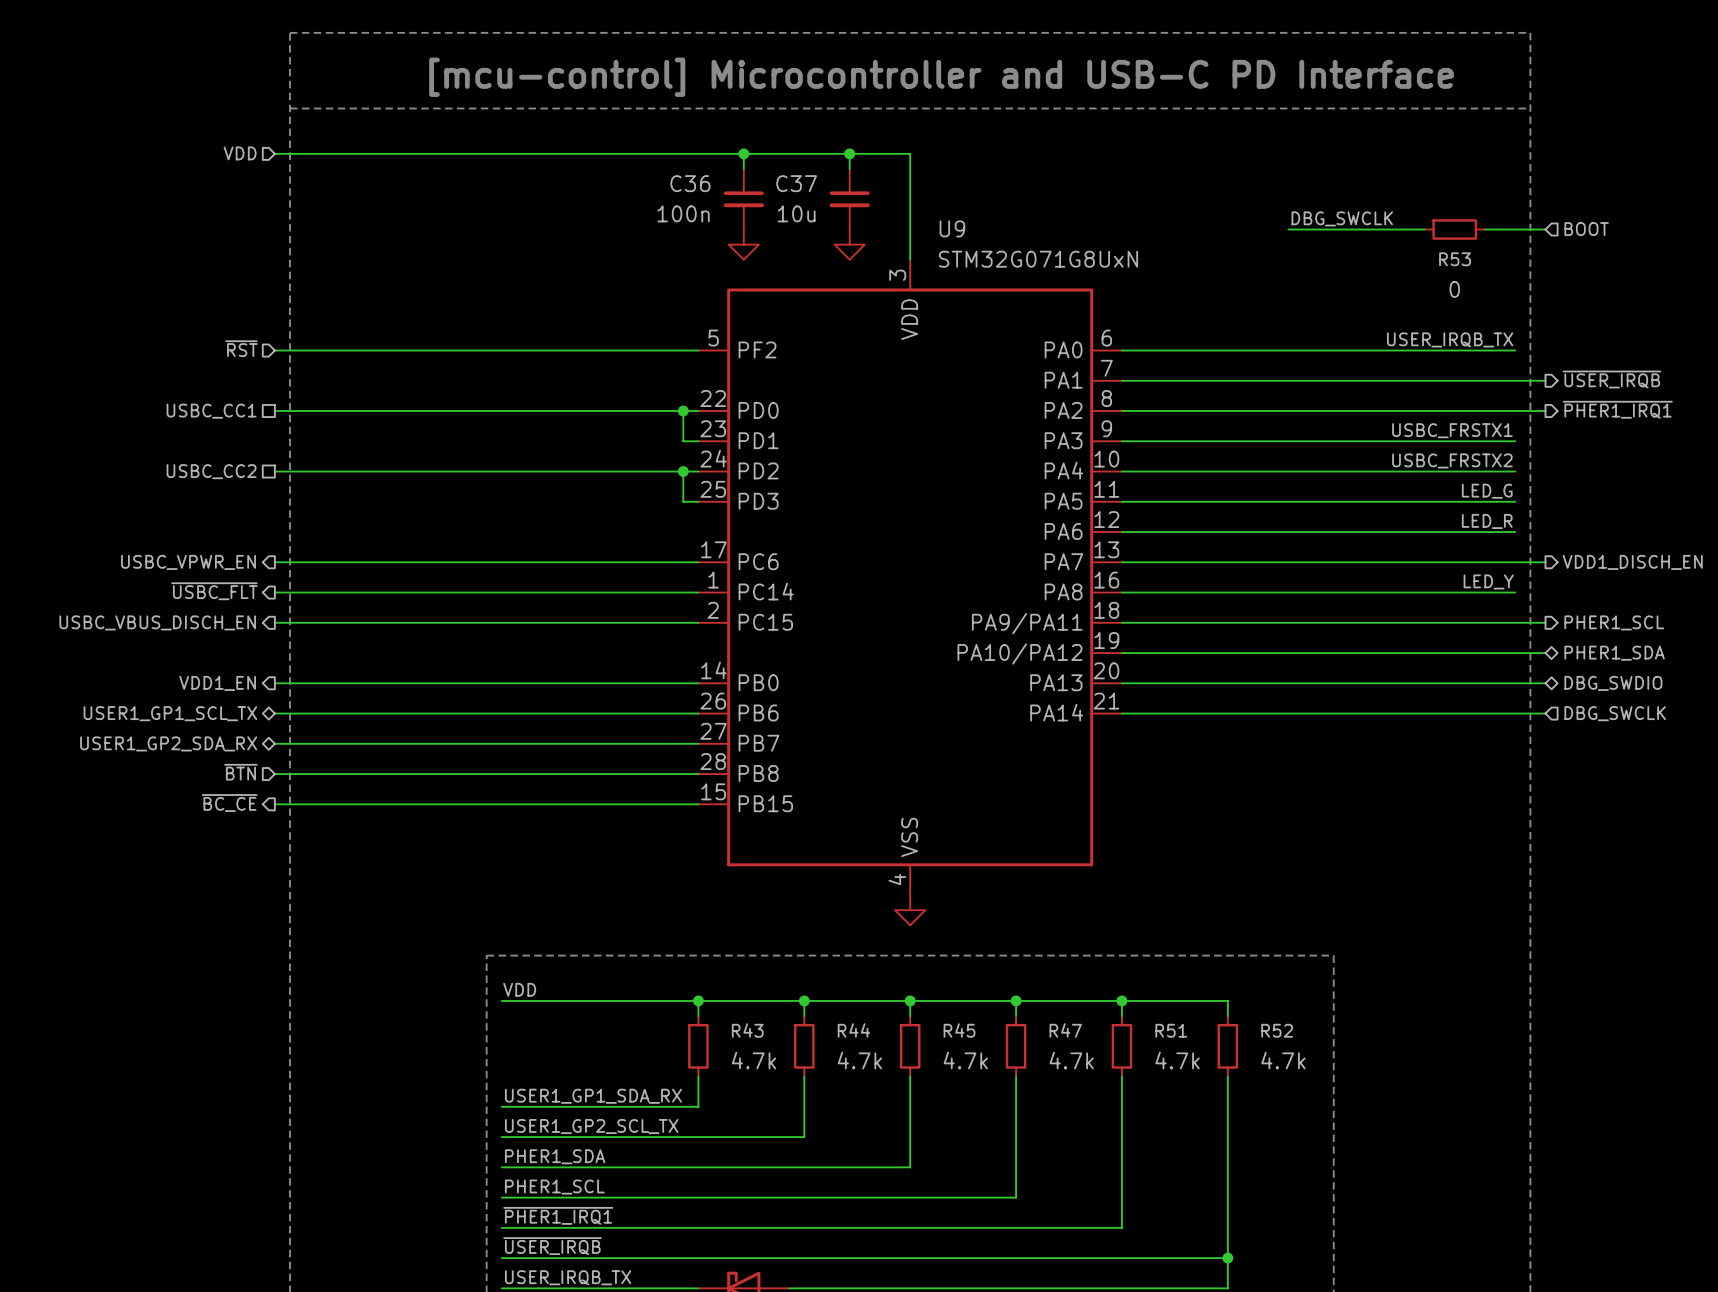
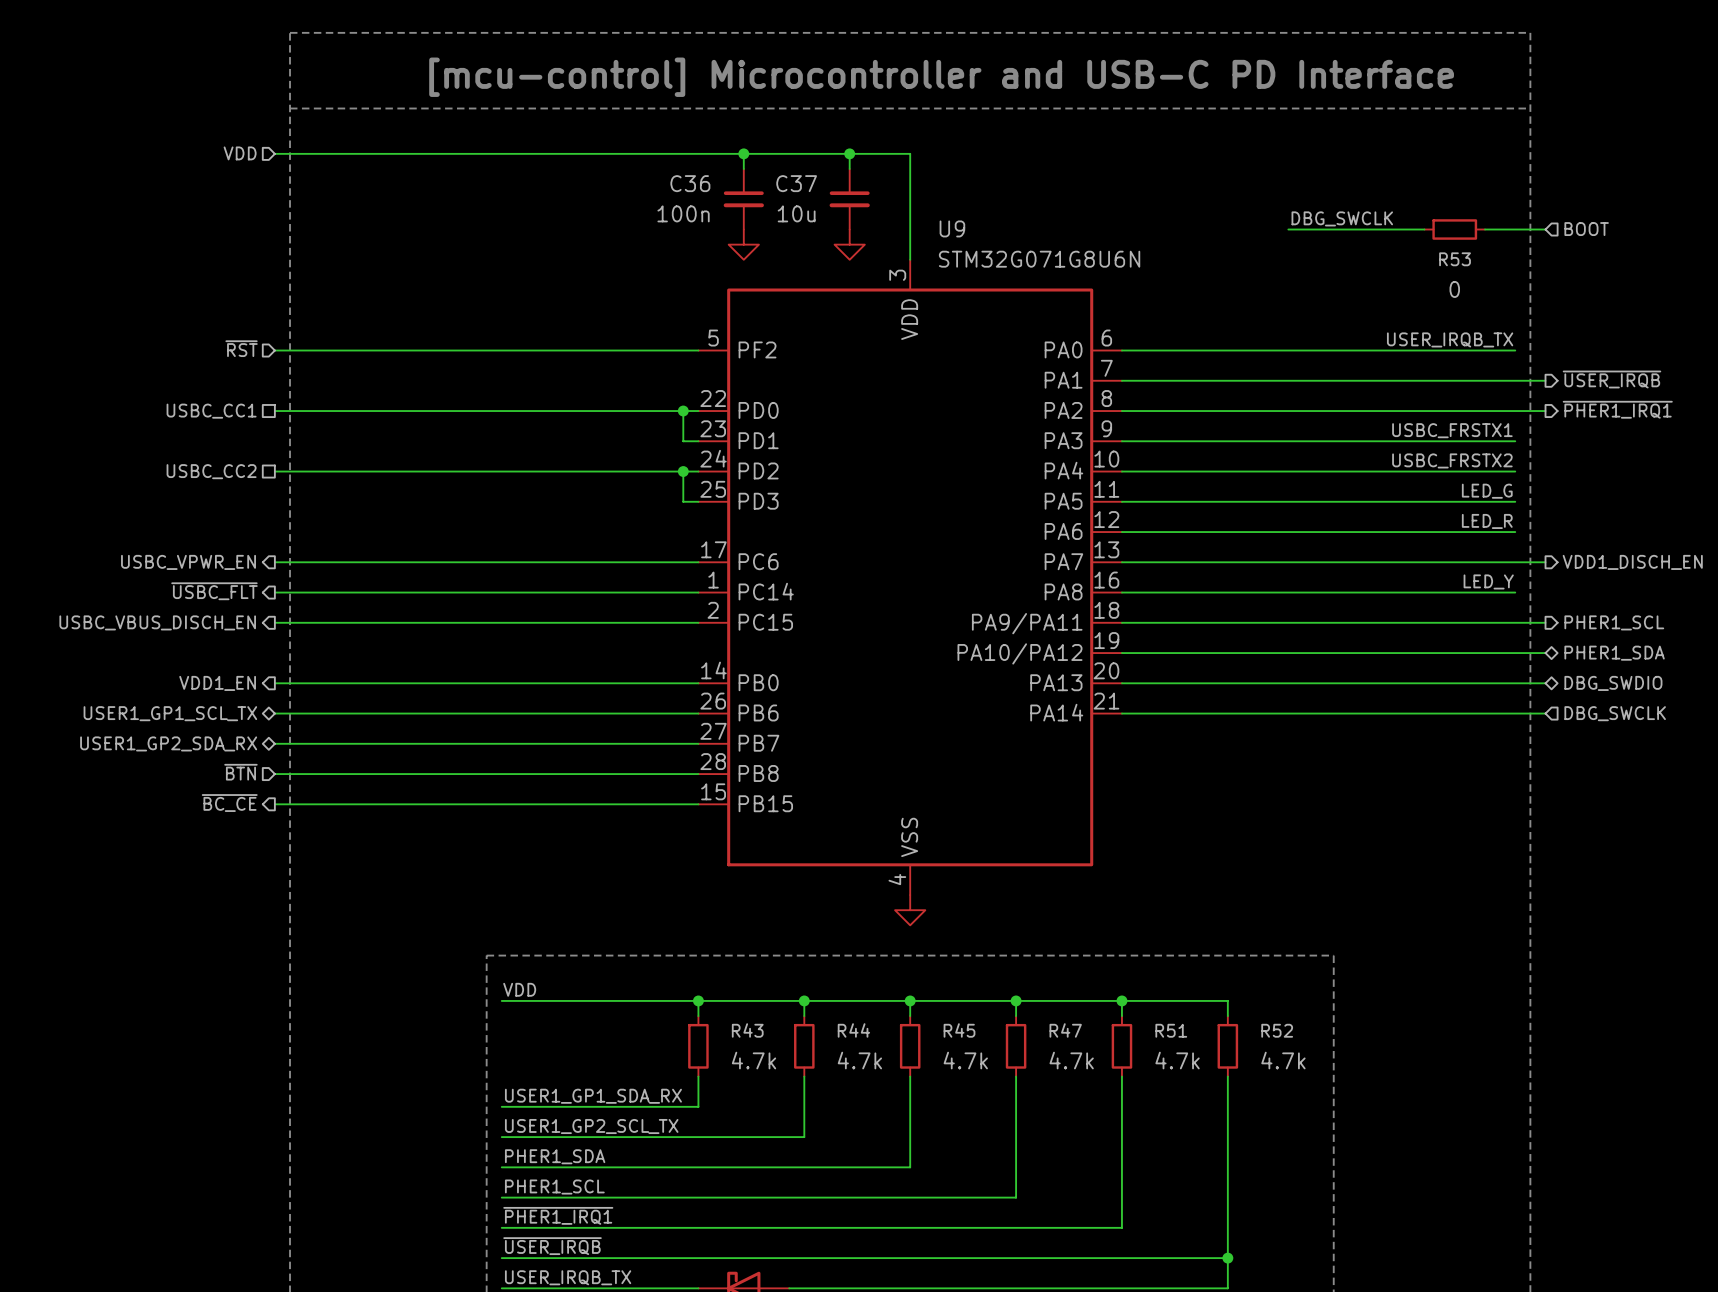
U9 value: STM32G071G8UxN (1038, 259) -> STM32G071G8U6N (1039, 259)

